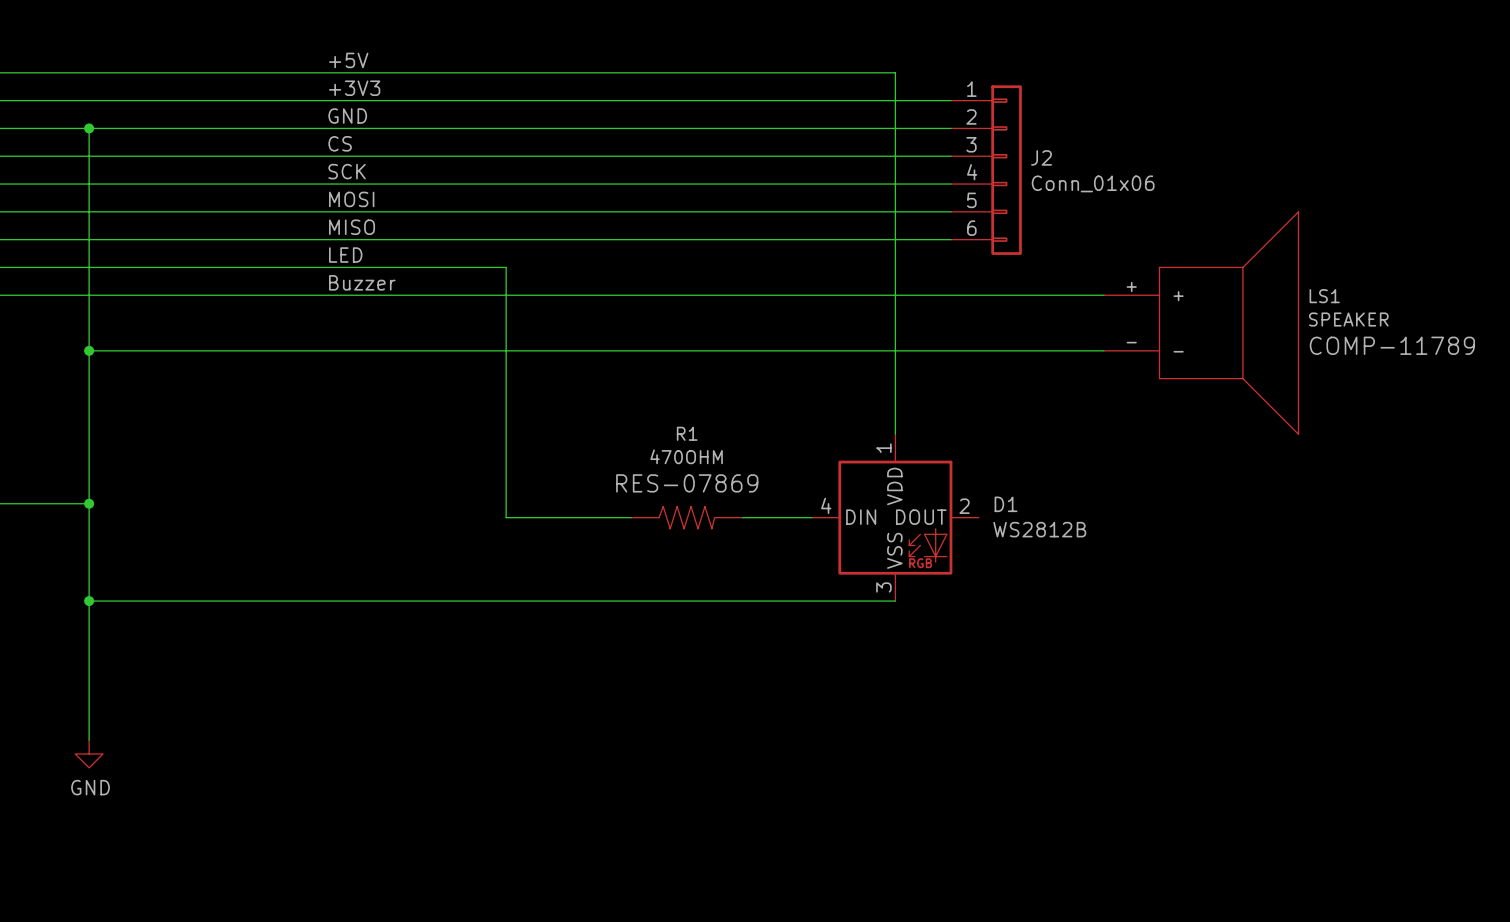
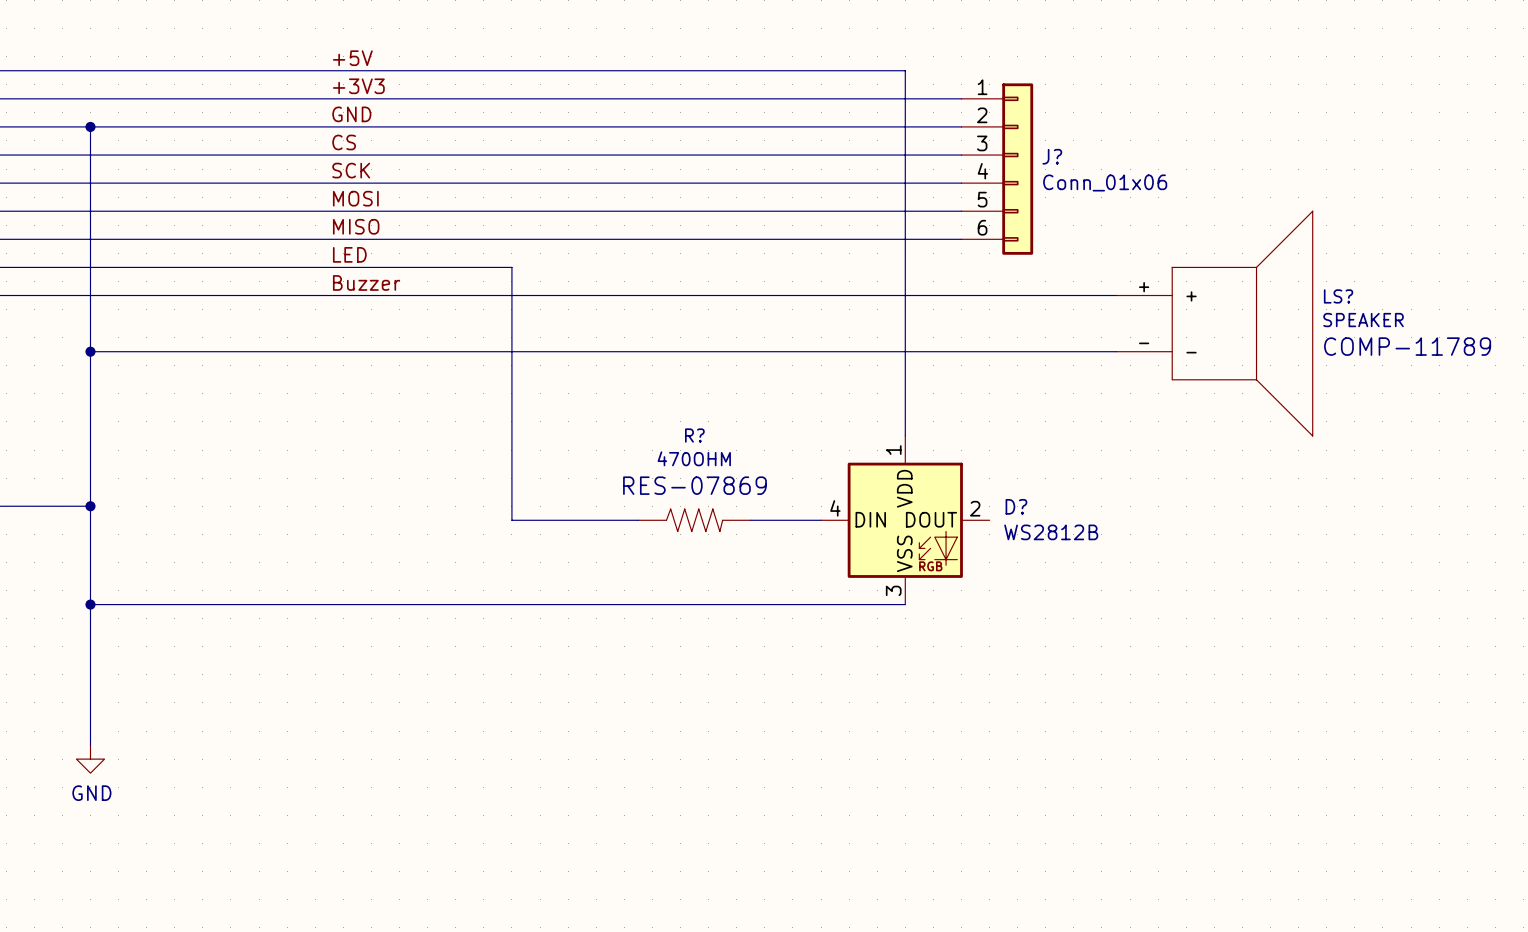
J2 name: J2 (1041, 157) -> J? (1052, 156)
LS1 name: LS1 (1324, 296) -> LS? (1338, 296)
R1 name: R1 (687, 433) -> R? (694, 435)
D1 name: D1 (1006, 504) -> D? (1016, 506)

